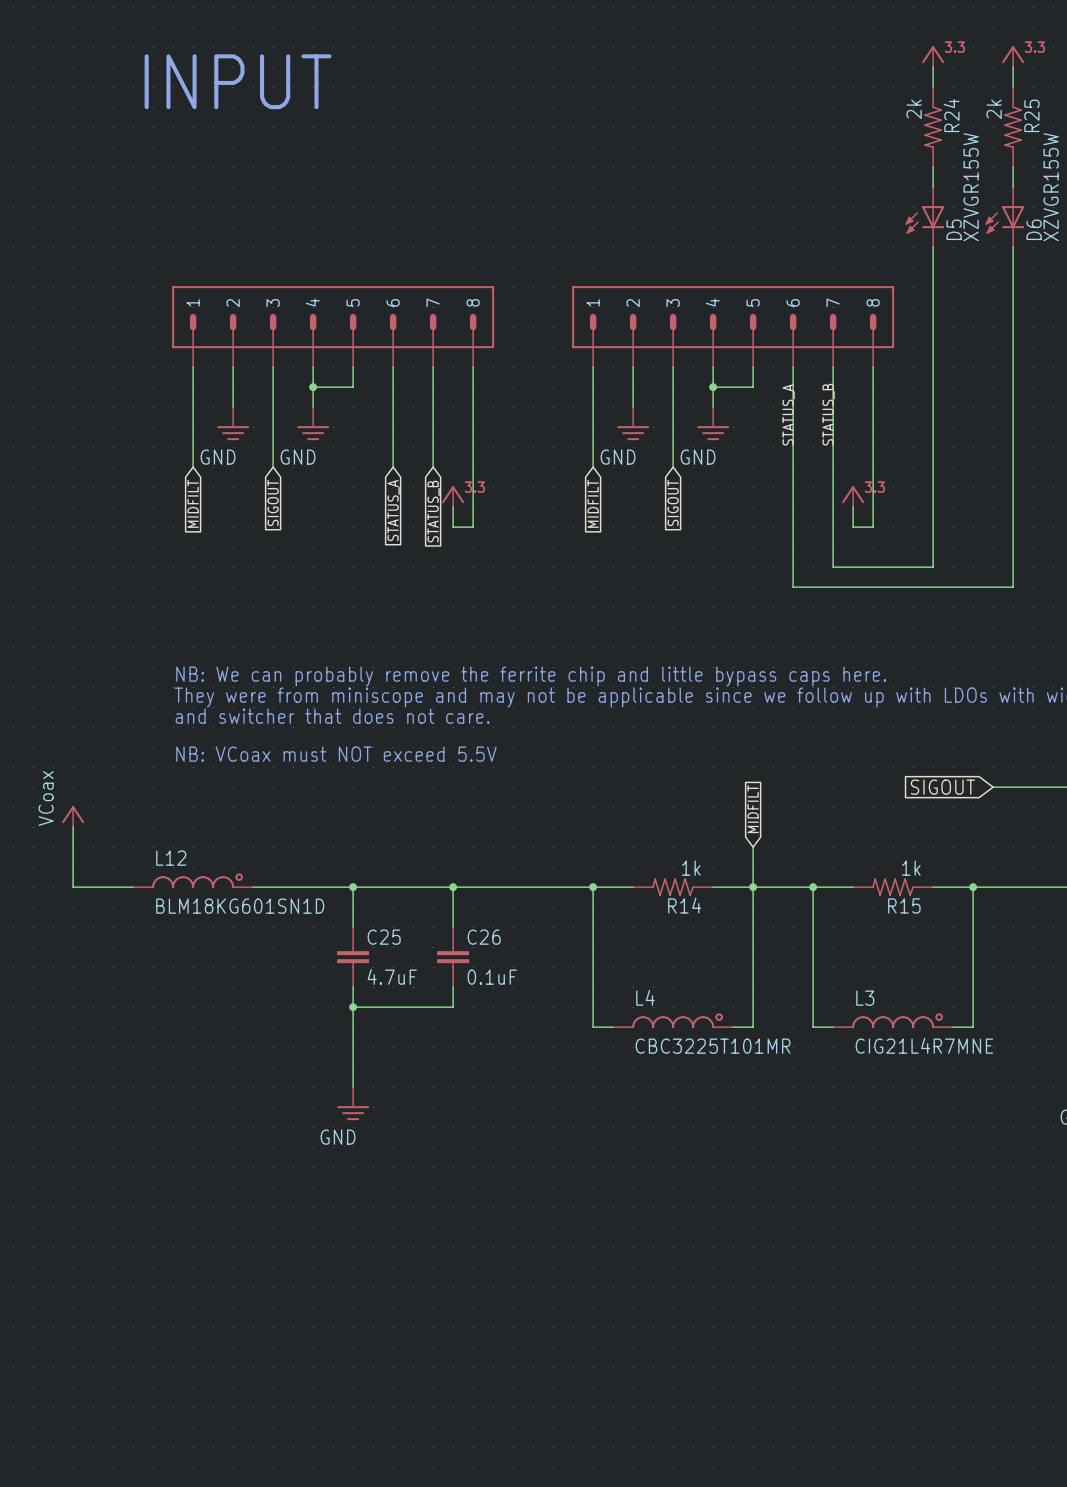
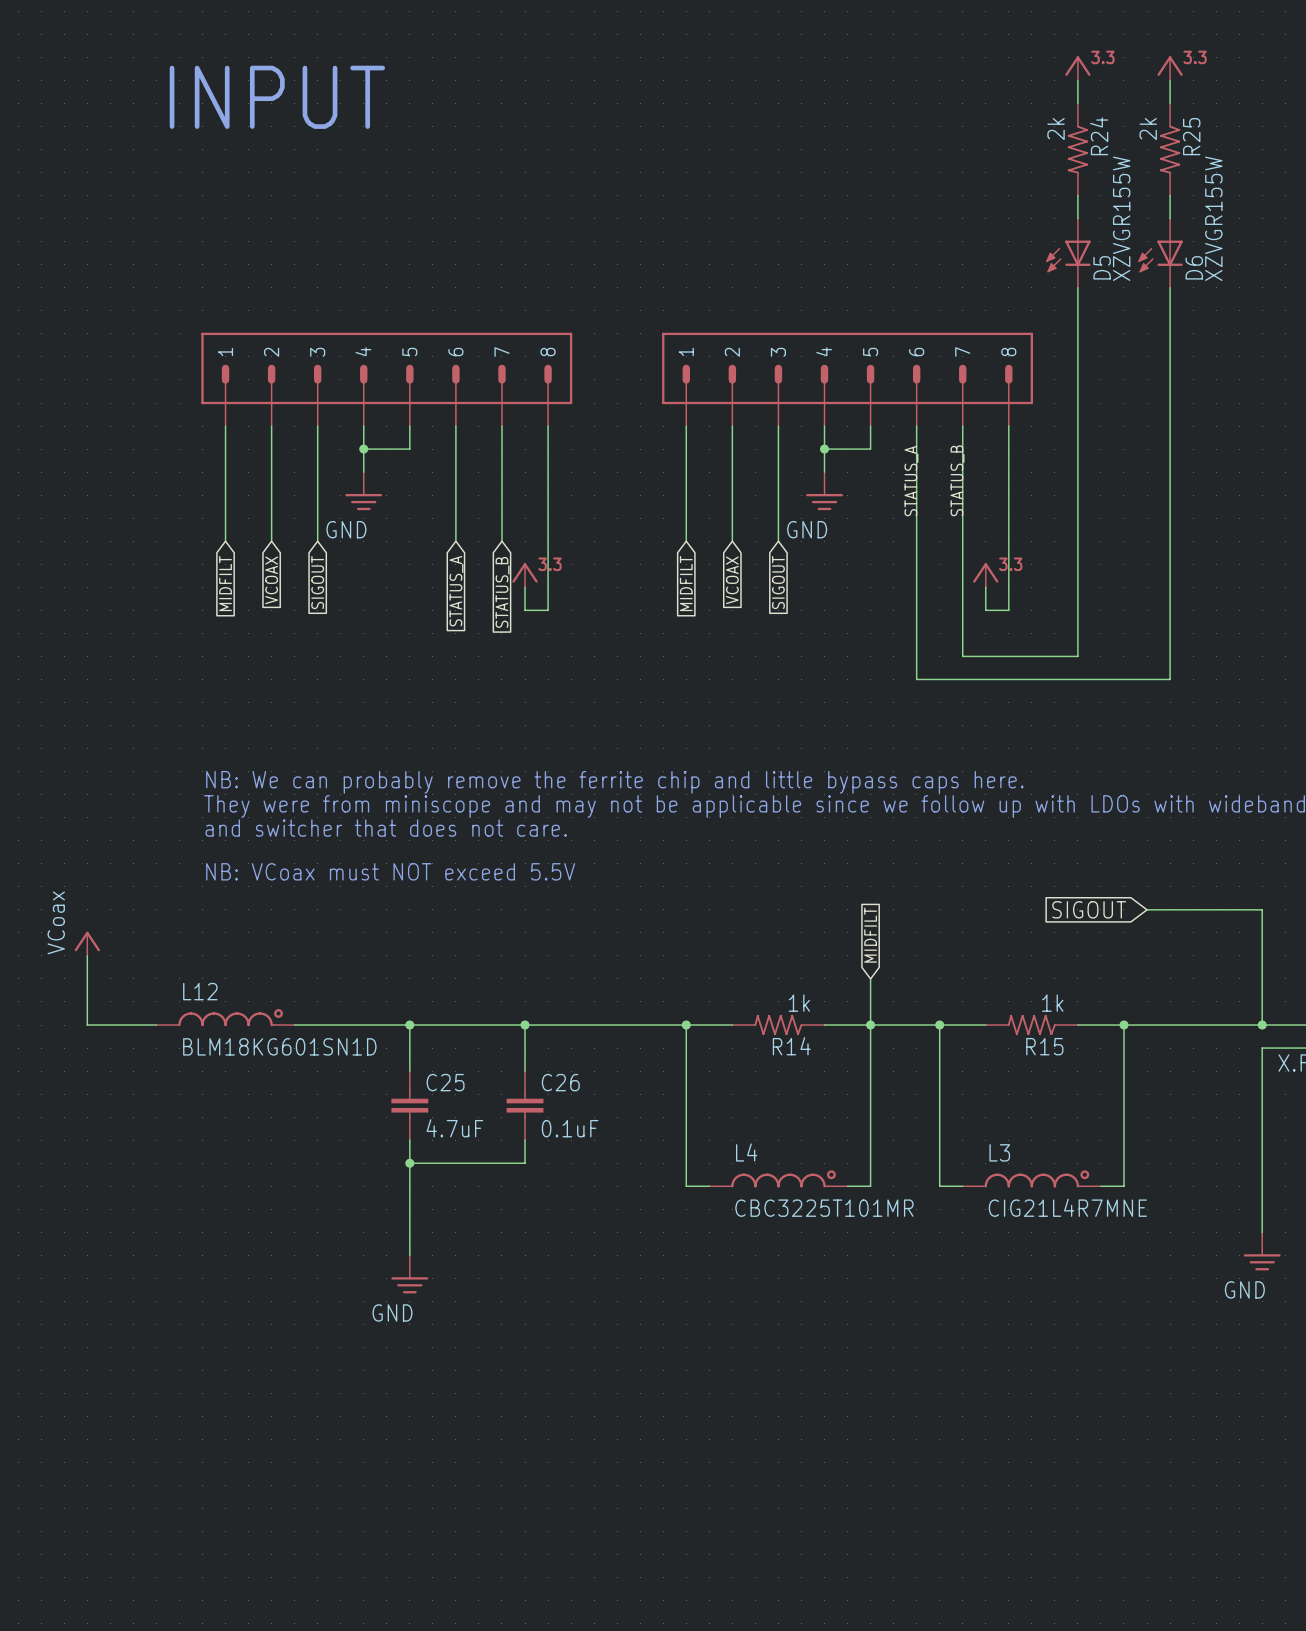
wire: none -> (271, 472) (271, 541)
wire: none -> (732, 472) (732, 541)
power symbol: GND (233, 423) -> none
power symbol: GND (633, 423) -> none
global label: none -> VCOAX (271, 580)
global label: none -> VCOAX (732, 580)

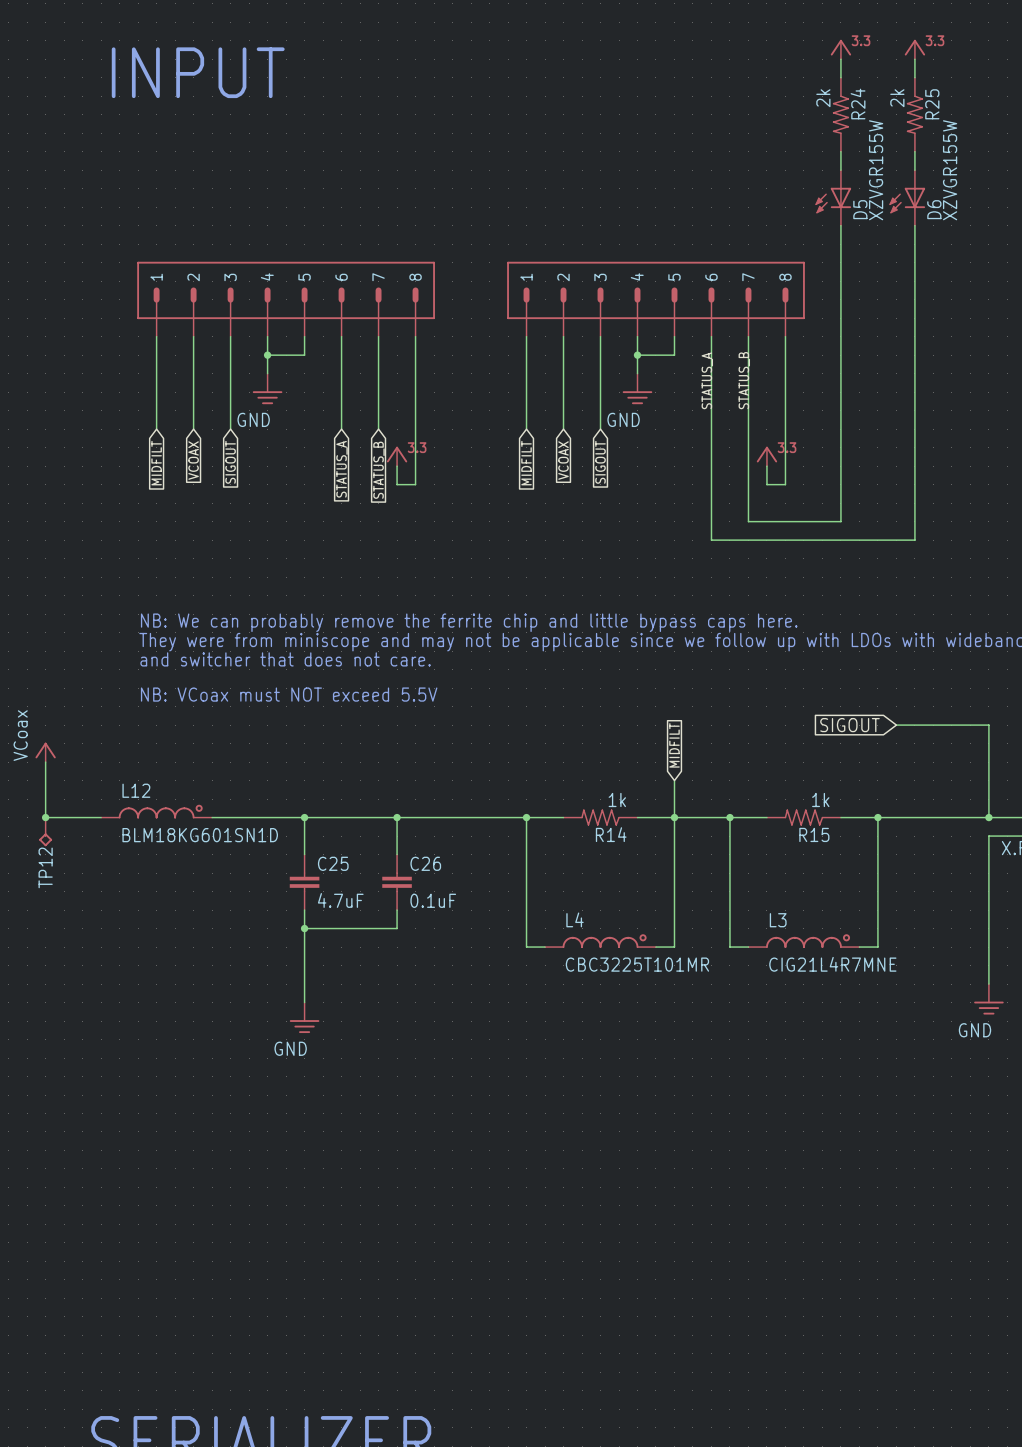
junction: none -> (45, 817)
TP12: none -> (45, 831)

